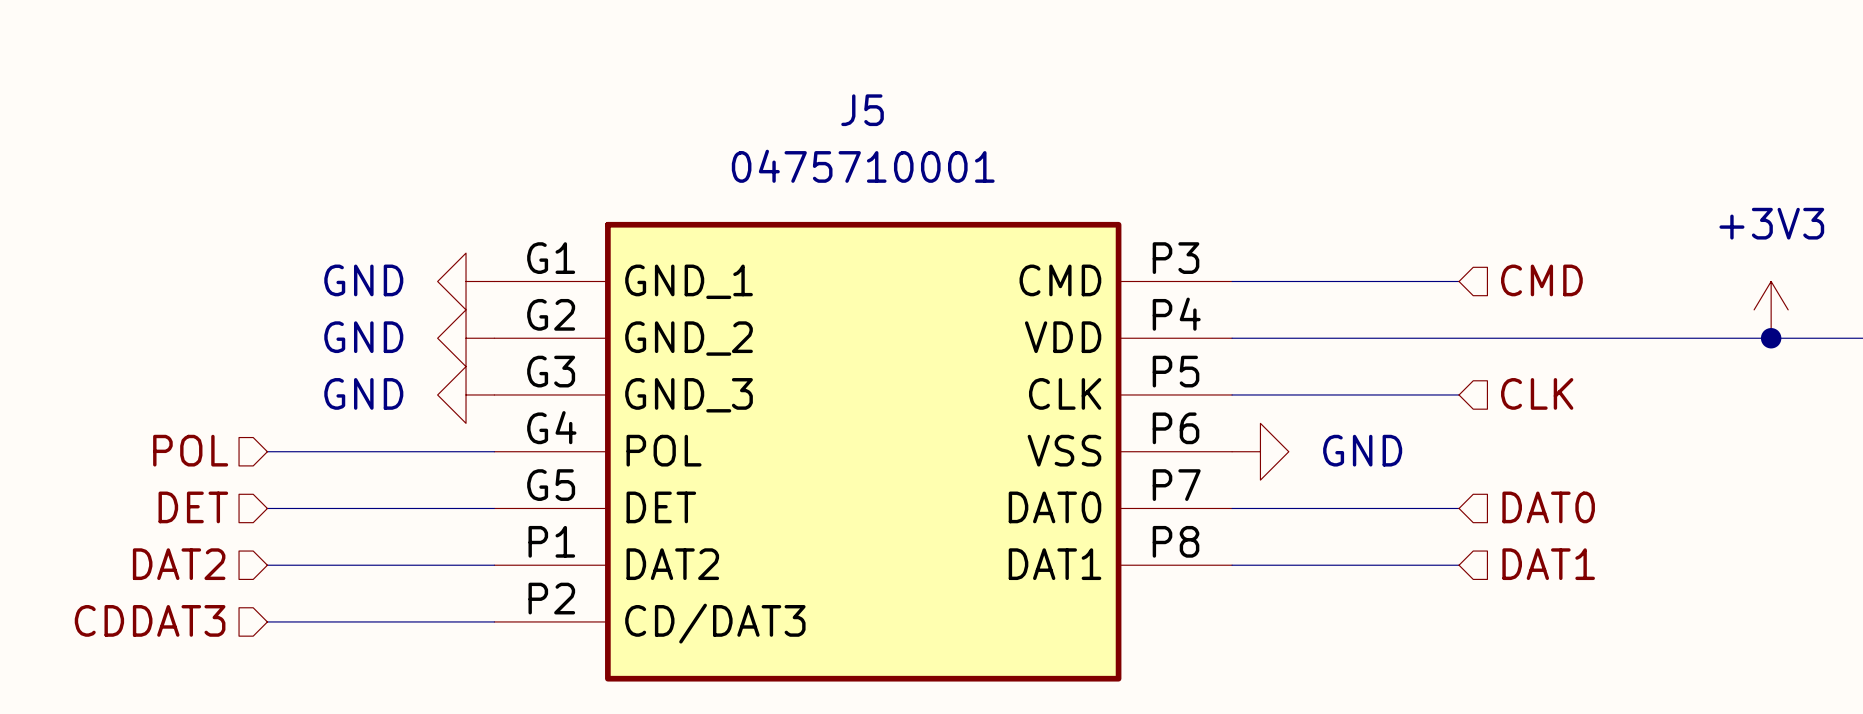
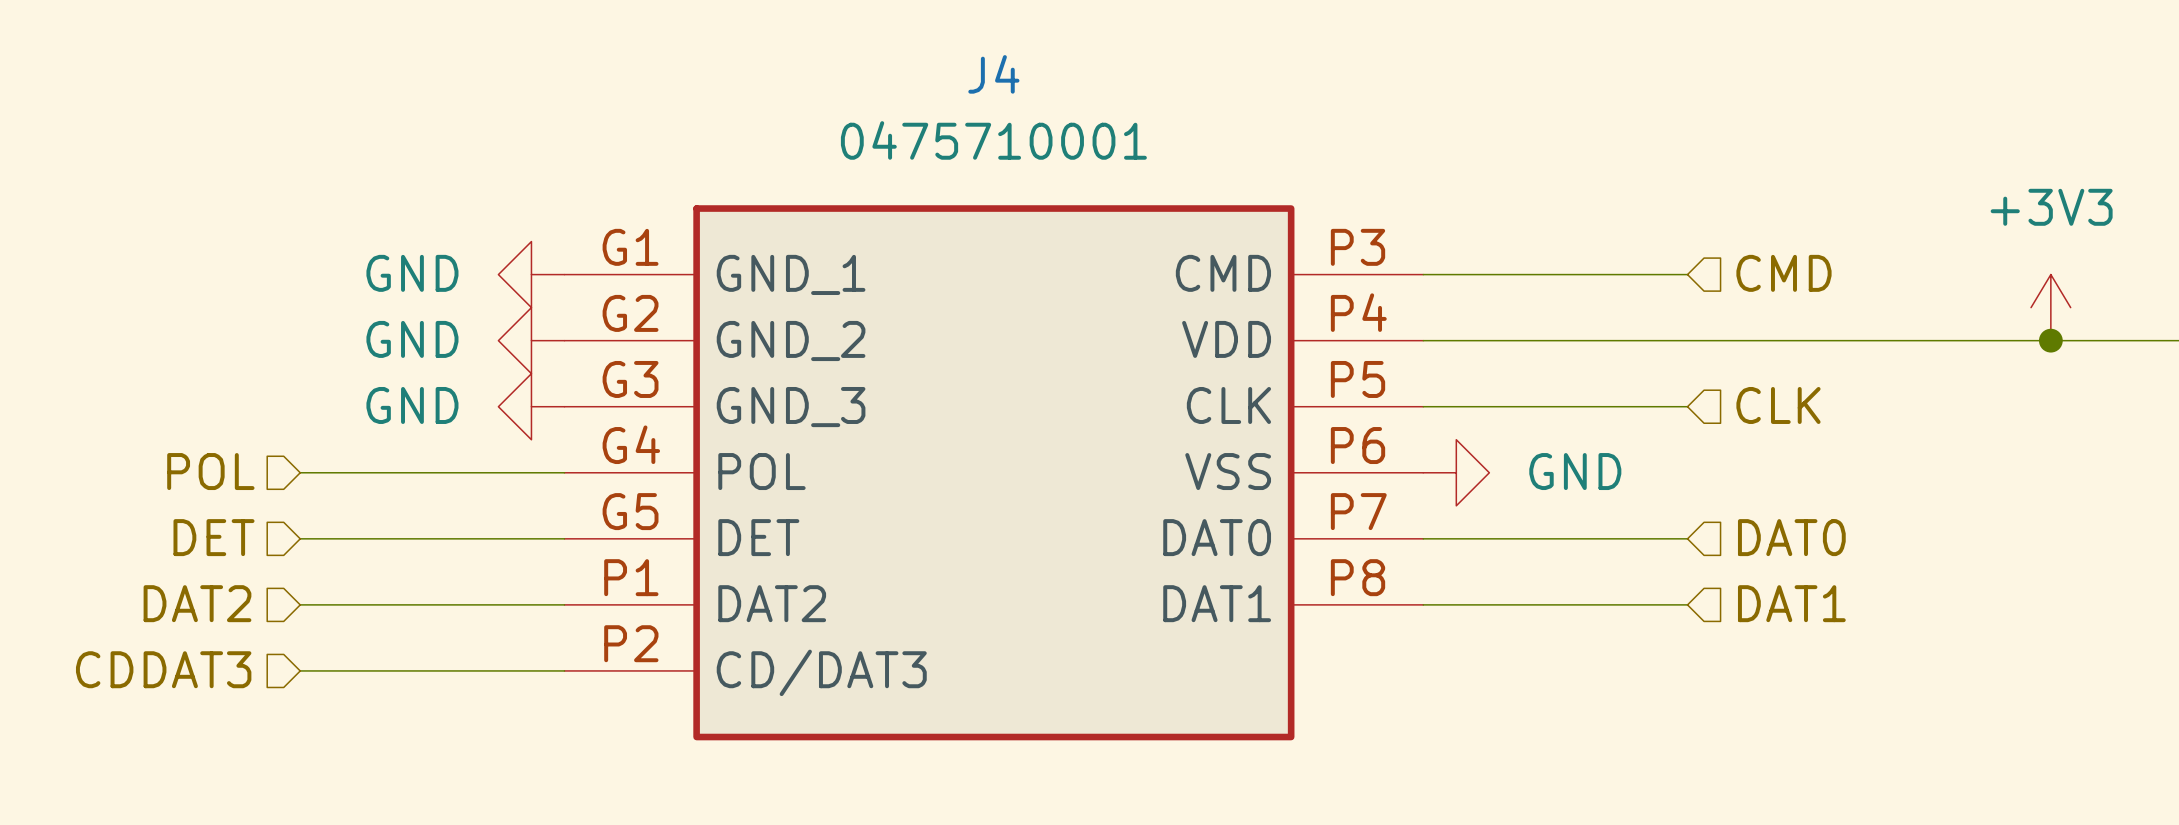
J5 name: J5 (862, 110) -> J4 (993, 74)

